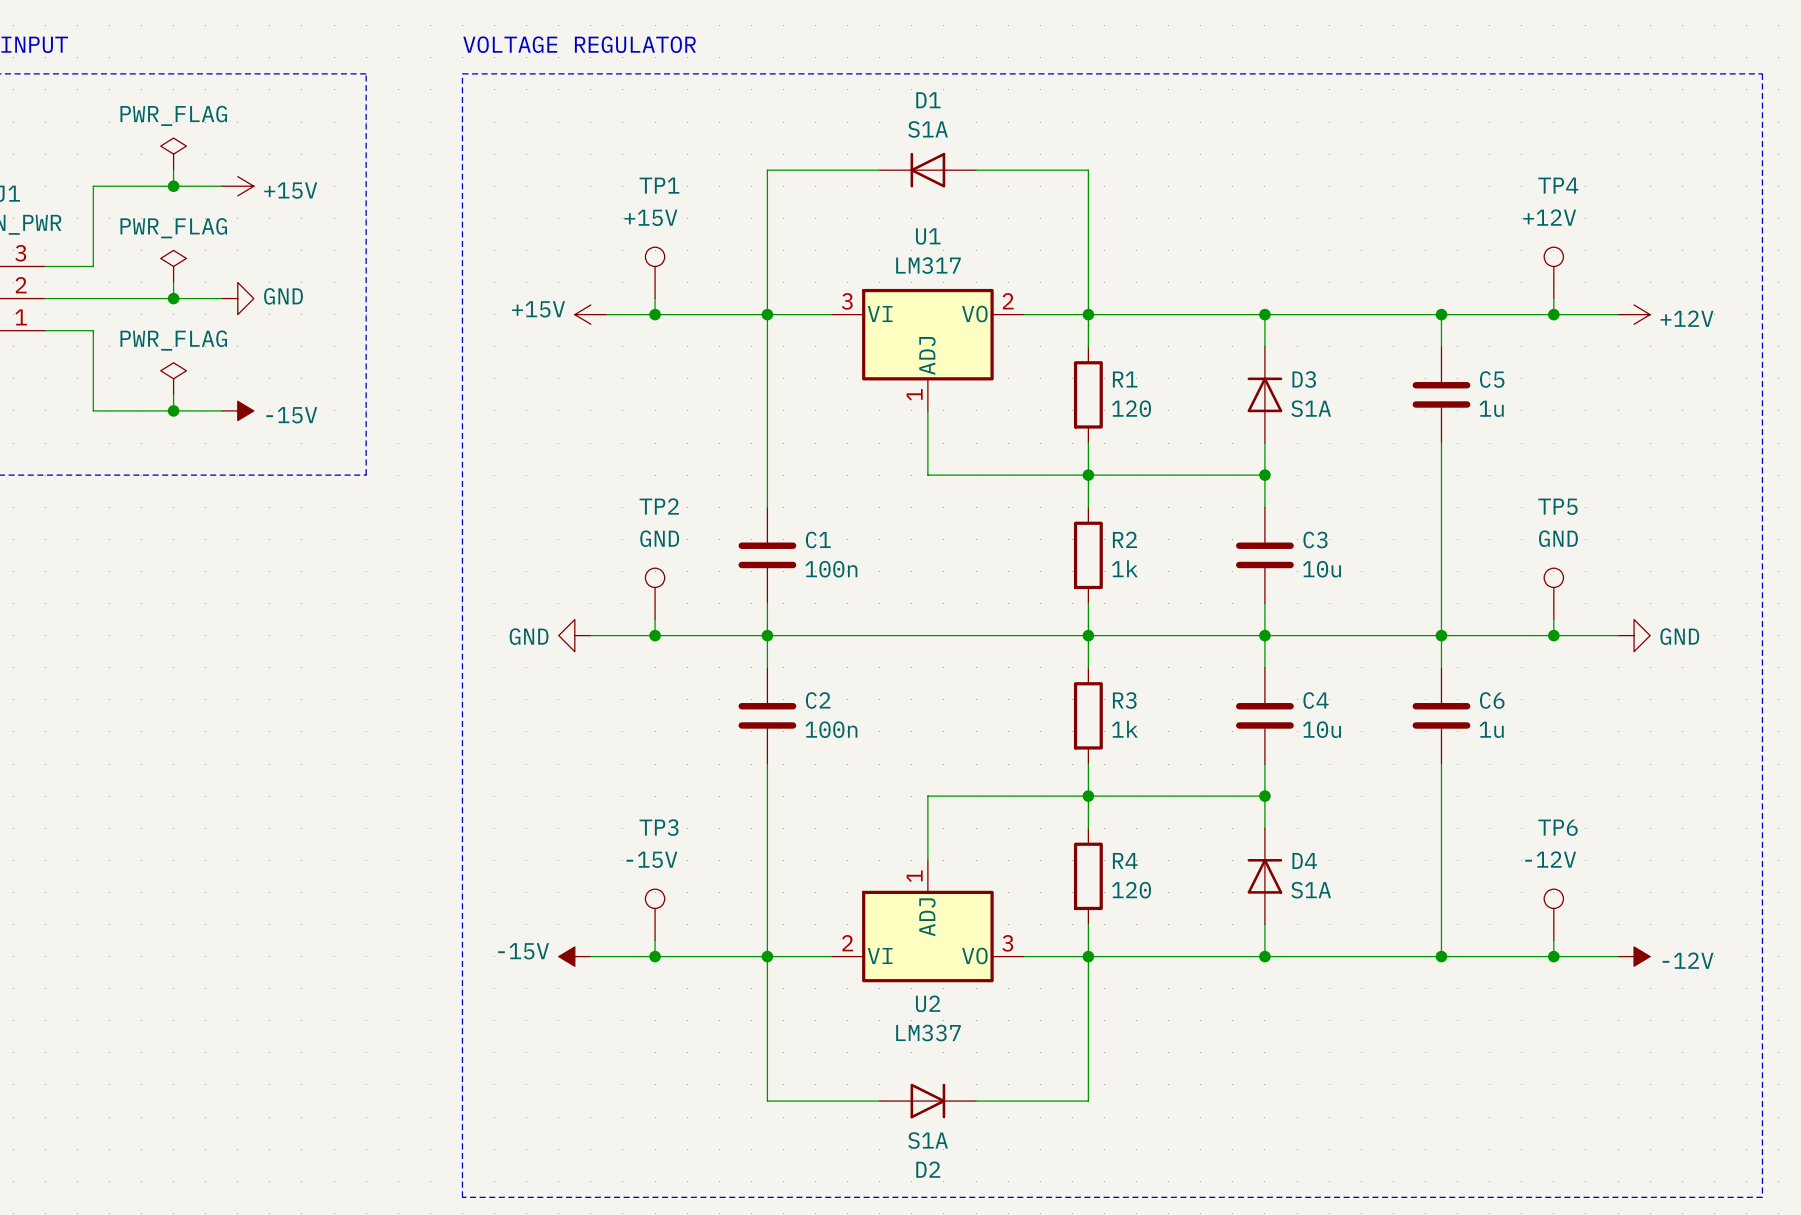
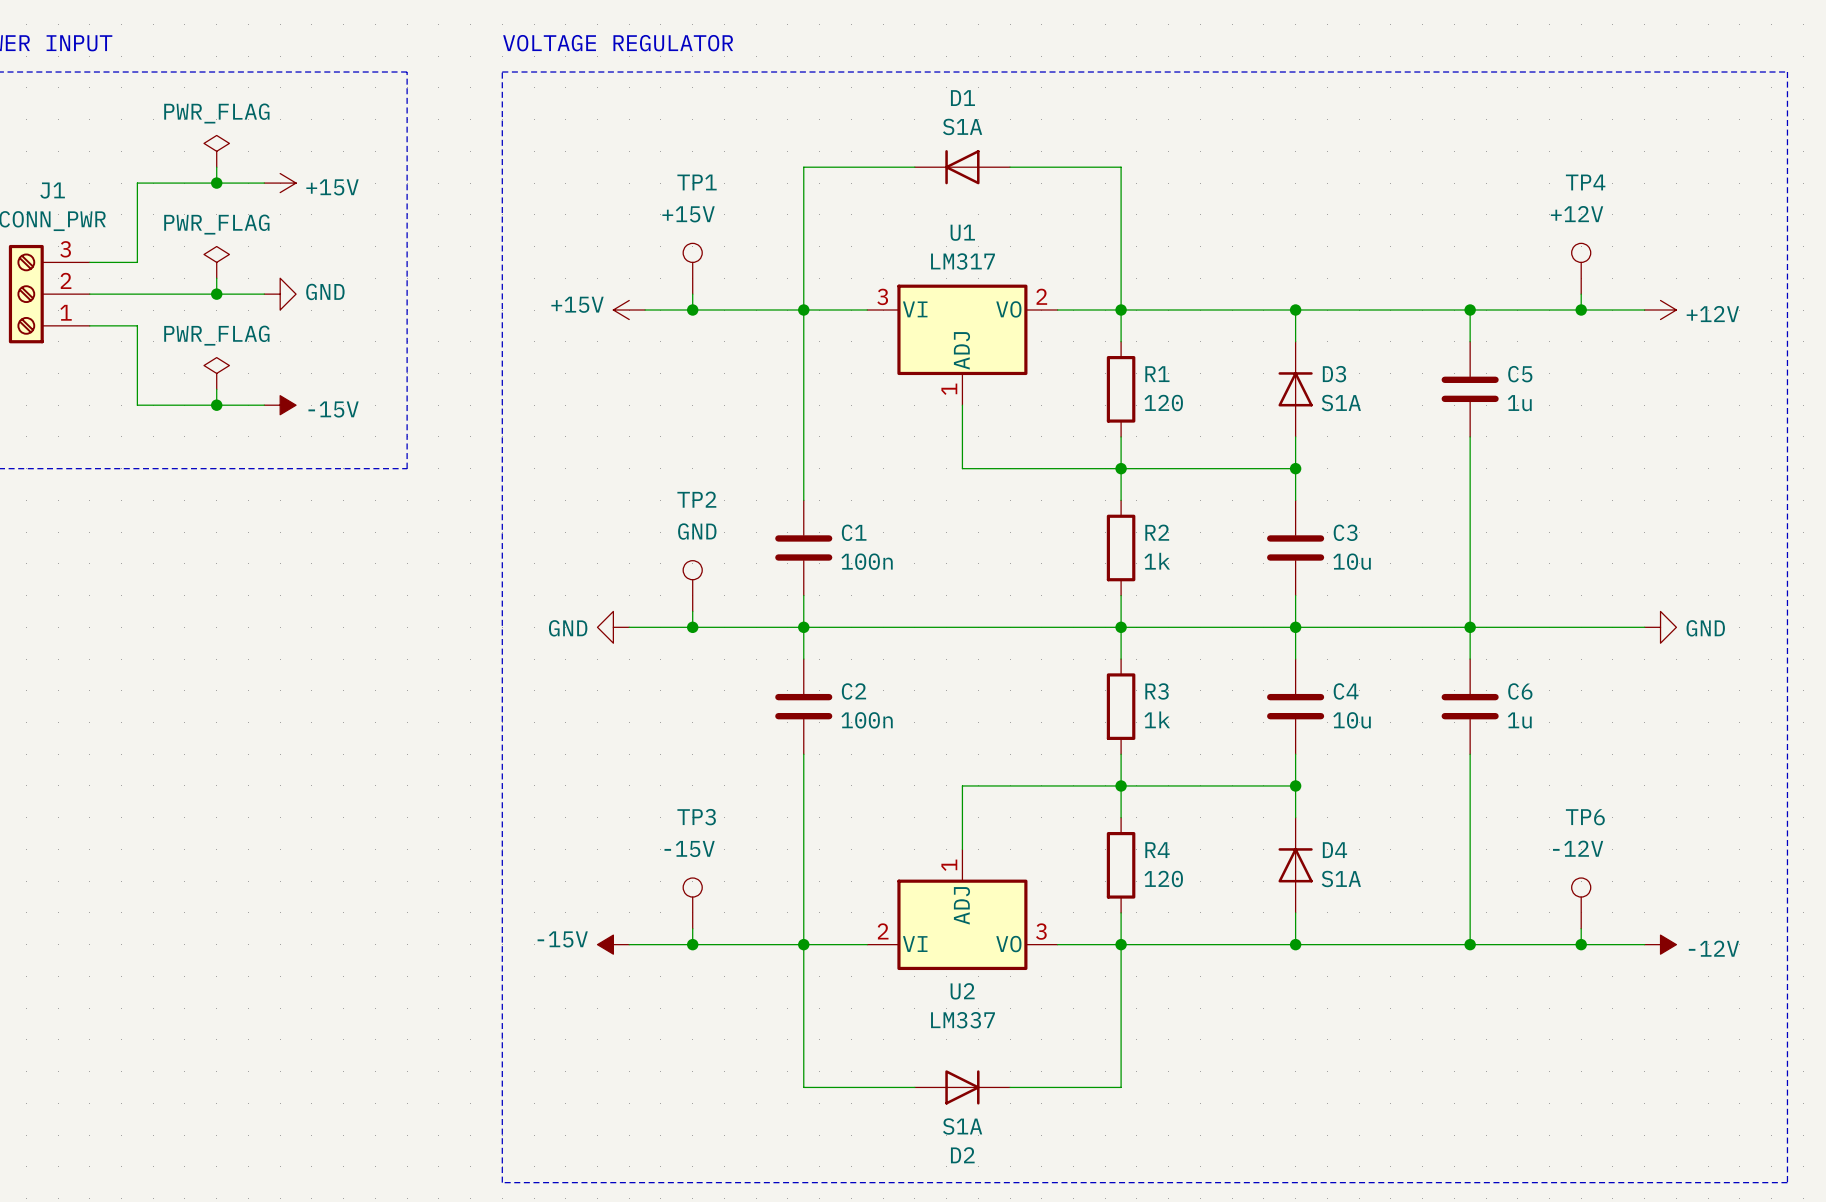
TP5: GND (1553, 593) -> none
wire: (1553, 619) (1553, 635) -> none
junction: (1553, 635) -> none

